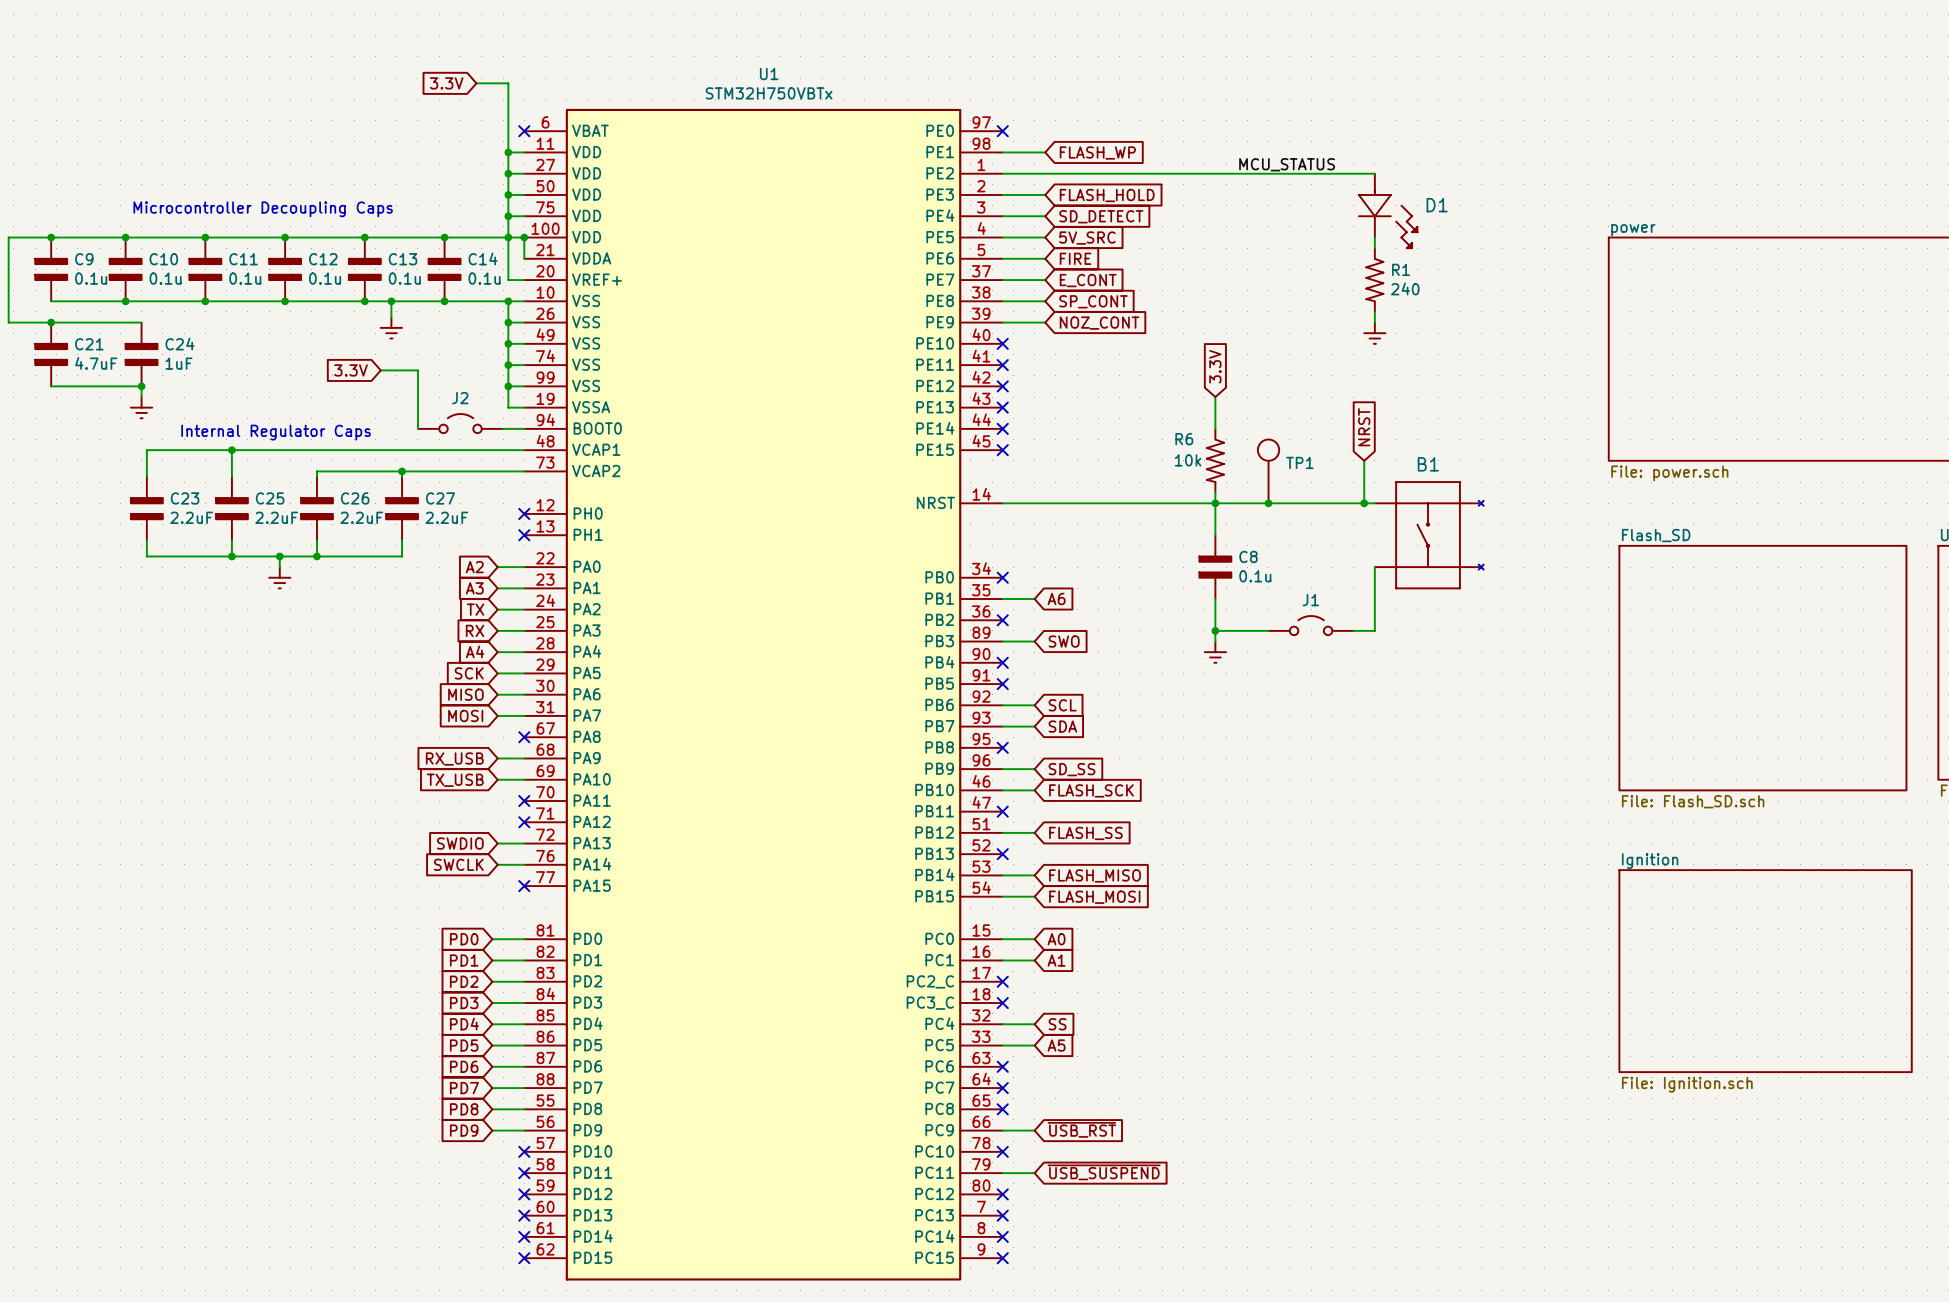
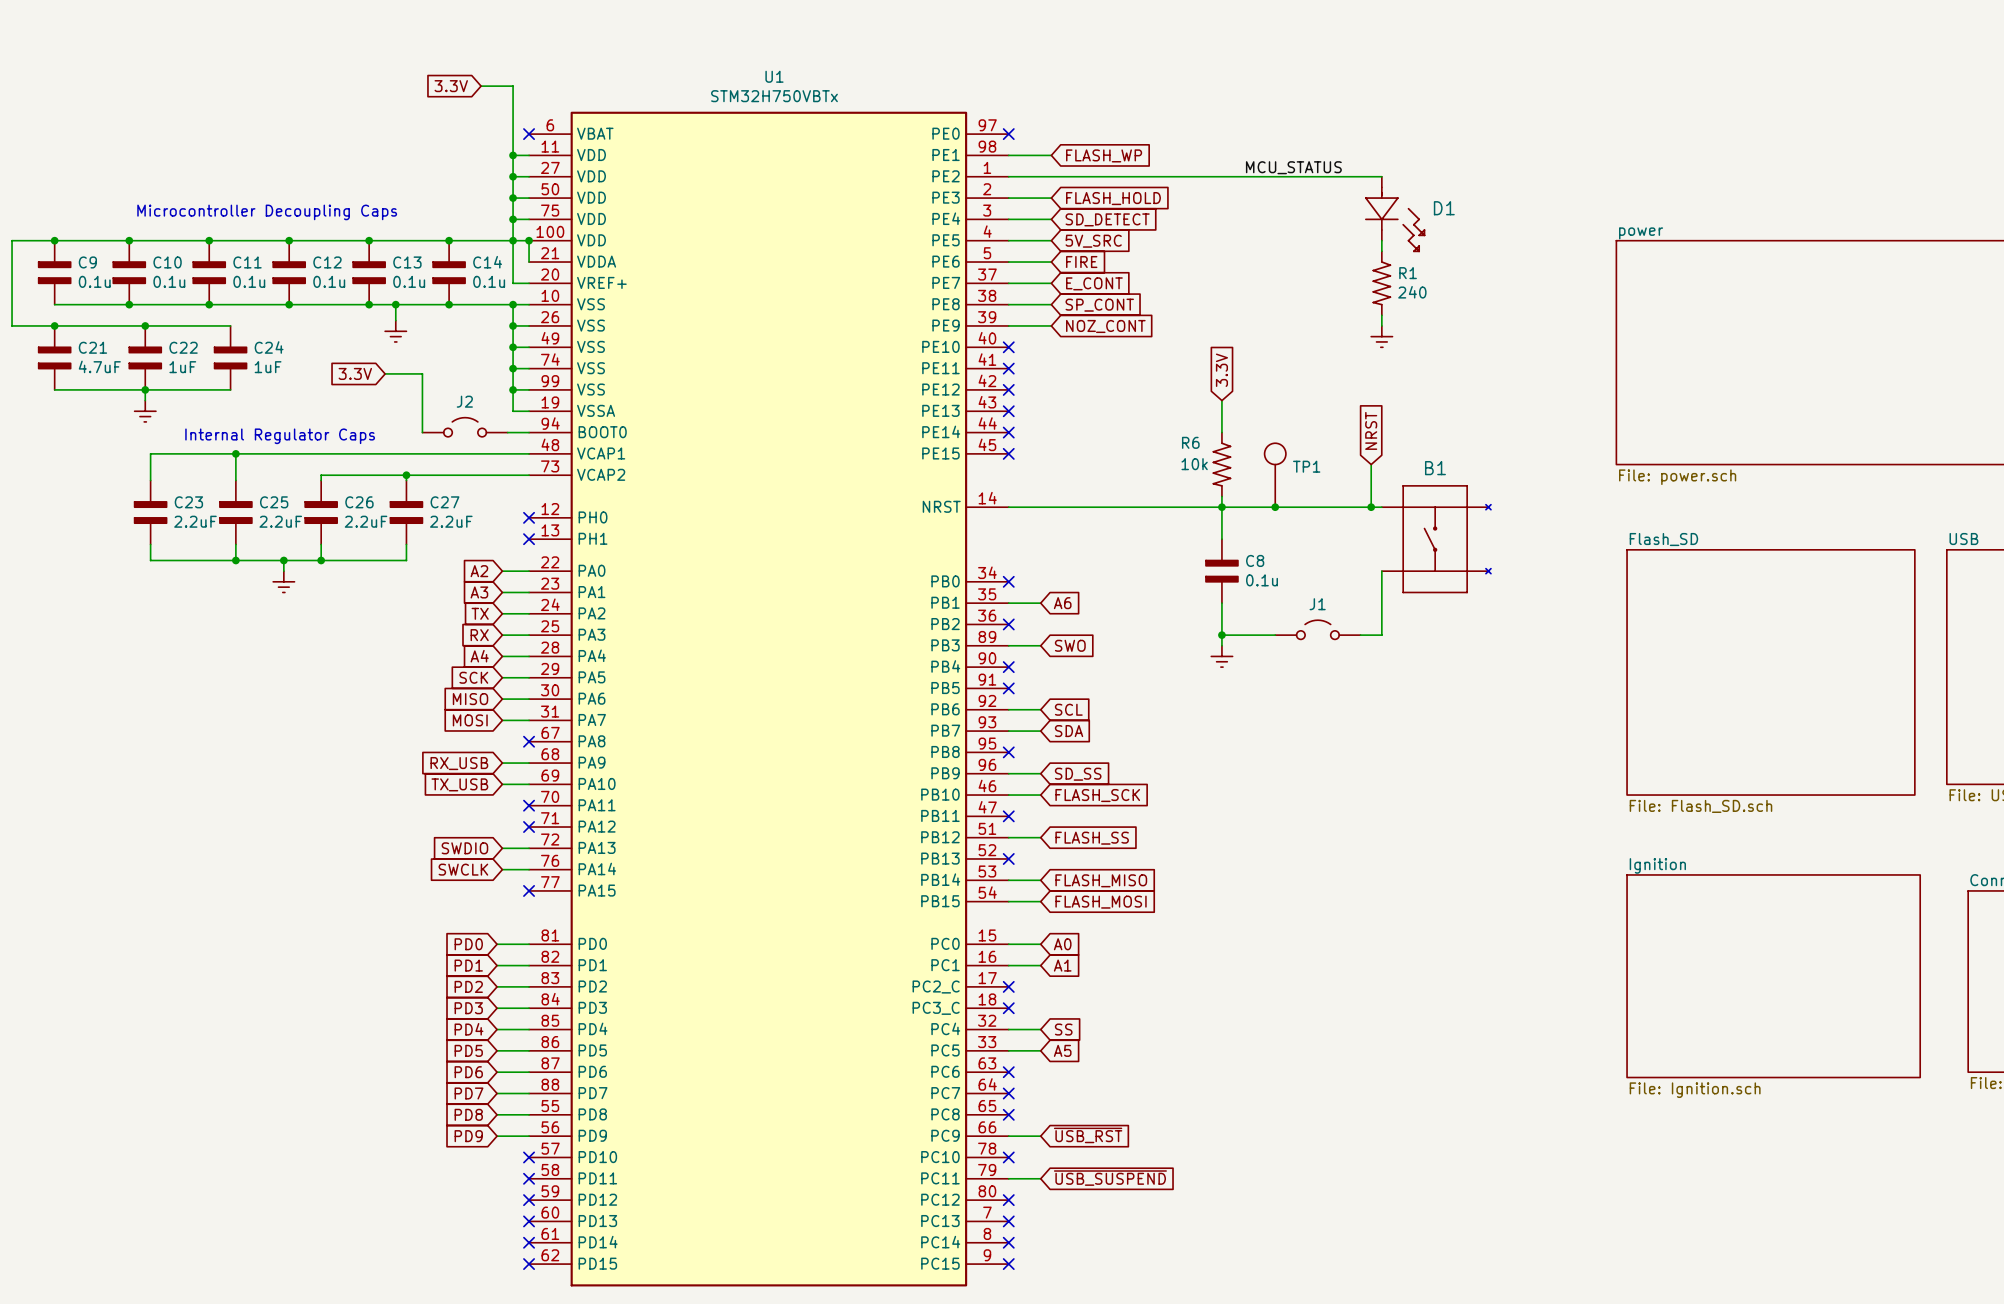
wire: none -> (145, 325) (230, 325)
junction: none -> (145, 325)
C24 name: C24 (179, 344) -> C22 (183, 347)
C24: none -> 1uF (230, 357)
wire: none -> (145, 389) (230, 389)

